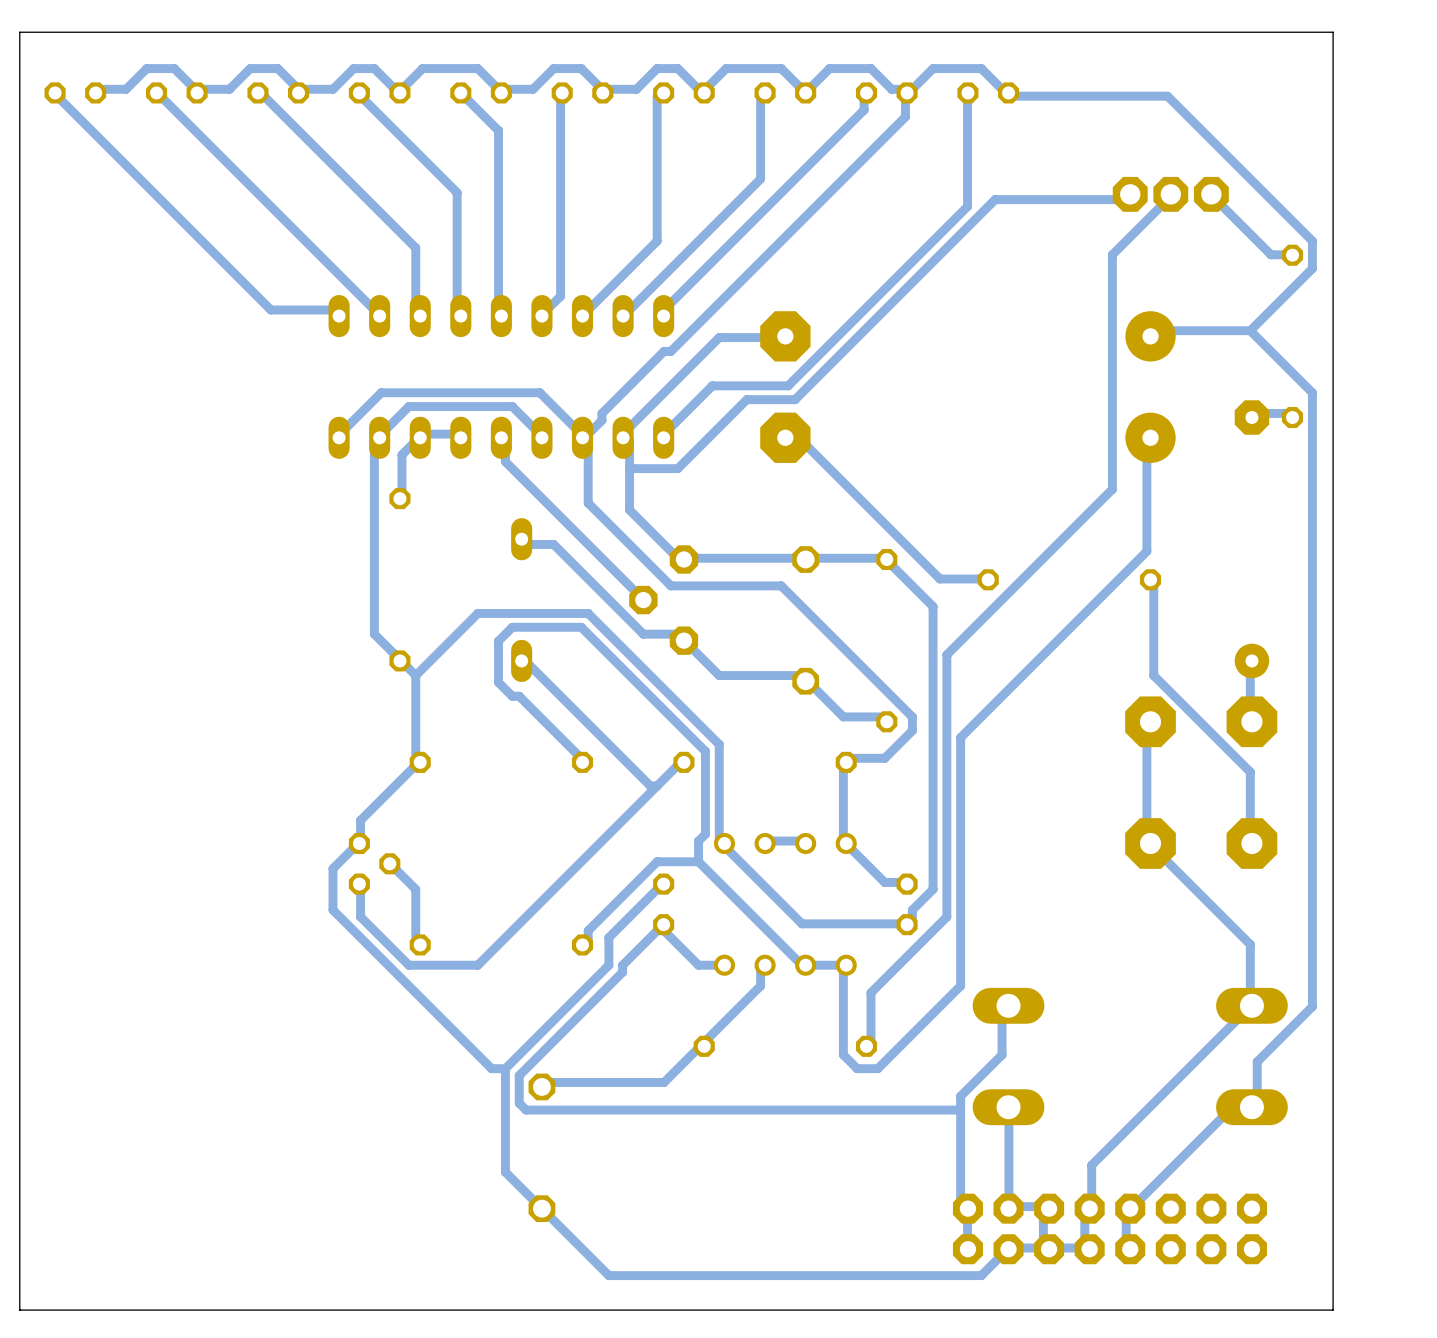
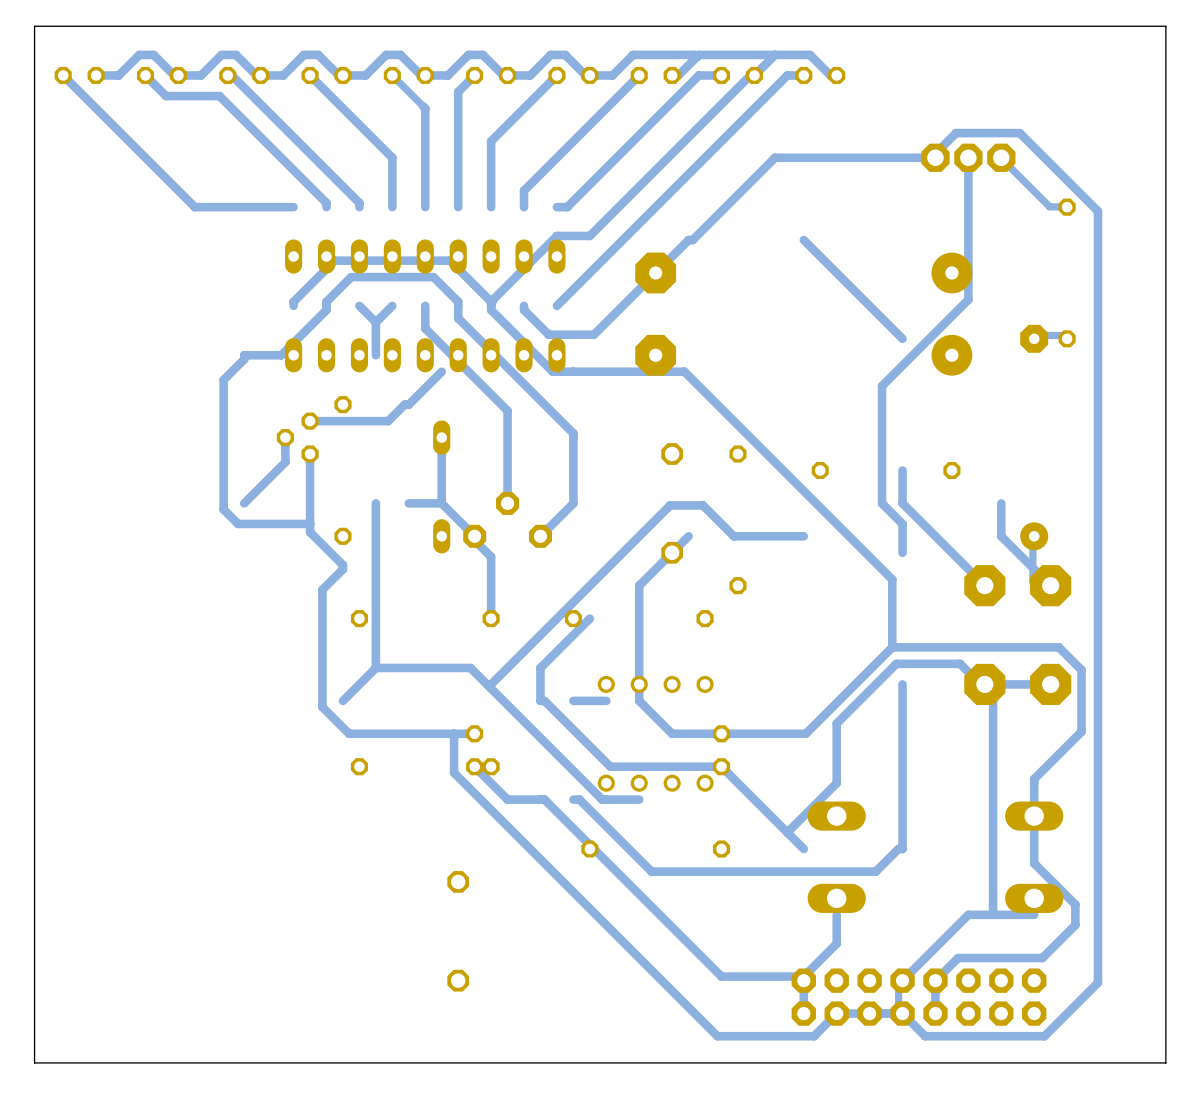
board edge: (1333, 32) (1333, 1310) -> (1100, 26) (1165, 26) (1165, 1062) (1100, 1062)
bottom track: none -> (775, 54) (754, 75) (750, 75) (589, 235) (556, 235) (493, 299) (491, 305)
bottom track: (55, 92) (270, 309) (333, 309) (339, 316) -> (63, 75) (194, 207) (293, 207)
bottom track: (156, 92) (379, 316) -> (145, 75) (166, 96) (219, 96) (326, 203) (326, 207)
bottom track: (257, 92) (264, 96) (415, 247) (415, 309) (420, 316) -> (227, 75) (231, 75) (359, 203) (359, 207)
bottom track: (359, 92) (457, 192) (457, 309) (460, 316) -> (310, 75) (392, 157) (392, 207)
bottom track: (562, 92) (560, 96) (560, 296) (541, 316) -> (474, 75) (458, 91) (458, 207)
bottom track: (663, 92) (657, 96) (657, 241) (582, 316) -> (556, 75) (491, 141) (491, 207)
bottom track: (765, 92) (760, 96) (760, 178) (623, 316) -> (639, 75) (524, 190) (524, 207)
bottom track: (866, 92) (864, 96) (864, 109) (664, 309) (663, 316) -> (721, 75) (698, 75) (567, 207) (556, 207)
bottom track: (907, 92) (905, 89) (891, 89) (870, 68) (829, 68) (805, 92) (781, 68) (726, 68) (705, 89) (704, 92) (677, 68) (657, 68) (636, 89) (608, 89) (602, 92) (601, 89) (581, 68) (553, 68) (533, 89) (505, 89) (501, 92) (477, 68) (422, 68) (399, 92) (374, 68) (353, 68) (333, 89) (298, 89) (277, 68) (250, 68) (229, 89) (201, 89) (197, 92) (174, 68) (146, 68) (126, 89) (98, 89) (95, 92) -> (696, 56) (694, 54) (633, 54) (612, 75) (585, 75) (565, 54) (550, 54) (530, 75) (503, 75) (482, 54) (468, 54) (447, 75) (421, 75) (400, 54) (386, 54) (365, 75) (338, 75) (318, 54) (303, 54) (283, 75) (256, 75) (236, 54) (221, 54) (201, 75) (174, 75) (153, 54) (139, 54) (118, 75) (96, 75)
bottom track: (907, 92) (933, 68) (981, 68) (1002, 89) (1008, 92) (1008, 96) (1167, 96) (1312, 241) (1312, 268) (1250, 330) -> none
bottom track: (907, 92) (905, 116) (670, 351) (664, 351) (601, 413) (601, 420) (582, 437) -> none
bottom track: (967, 92) (967, 206) (788, 385) (712, 385) (664, 434) (663, 437) -> (803, 75) (787, 75) (556, 305)
bottom track: none -> (836, 75) (830, 75) (809, 54) (698, 54) (678, 75) (672, 75)
bottom track: (498, 130) (498, 309) (501, 316) -> (422, 106) (425, 108) (425, 207)
bottom track: (1130, 194) (1126, 199) (995, 199) (795, 399) (746, 399) (677, 468) (629, 468) -> none
bottom track: (1170, 194) (1112, 254) (1112, 489) (946, 654) (946, 916) (870, 992) (870, 1041) (866, 1046) -> (968, 157) (968, 299) (881, 386) (881, 503) (902, 523) (902, 552)
bottom track: none -> (803, 240) (902, 338)
bottom track: (1250, 330) (1312, 392) (1312, 1006) (1257, 1061) (1257, 1103) (1250, 1110) (1229, 1110) (1126, 1213) (1126, 1248) (1130, 1249) -> (892, 647) (1058, 647) (1081, 670) (1081, 731) (1034, 779) (1034, 863) (1075, 904) (1075, 925) (1042, 958) (958, 958) (935, 980) (935, 1013)
bottom track: (1250, 330) (1153, 330) (1150, 336) -> none
bottom track: (785, 336) (719, 337) (622, 434) (623, 437) (629, 441) (629, 510) (677, 558) (683, 559) (884, 558) (933, 606) (933, 889) (912, 910) (912, 923) (802, 923) (726, 847) (724, 843) (719, 841) (719, 744) (588, 613) (477, 613) (415, 675) -> none
bottom track: none -> (293, 305) (293, 301) (334, 260) (449, 260) (491, 301) (491, 310) (552, 371) (684, 371) (892, 579) (892, 647)
bottom track: none -> (359, 305) (375, 322)
bottom track: none -> (392, 305) (375, 322)
bottom track: none -> (425, 305) (425, 328) (507, 410) (507, 503)
bottom track: none -> (524, 305) (524, 310) (548, 334) (593, 334) (688, 240) (692, 240) (775, 157) (935, 157) (935, 153) (956, 133) (1019, 133) (1097, 211) (1097, 982) (1044, 1036) (925, 1036) (902, 1013) (836, 1013) (814, 1036) (717, 1036) (454, 772) (454, 733)
bottom track: none -> (375, 322) (375, 355)
bottom track: (460, 437) (457, 434) (422, 434) (401, 454) (401, 496) (399, 498) -> none
bottom track: (501, 437) (505, 441) (505, 461) (643, 600) -> none
bottom track: (541, 437) (512, 406) (408, 406) (374, 441) (374, 634) (415, 675) -> none
bottom track: (582, 437) (581, 434) (539, 392) (381, 392) (339, 434) (339, 437) -> none
bottom track: (582, 437) (588, 441) (588, 503) (670, 585) (781, 585) (912, 716) (912, 730) (884, 758) (850, 758) (843, 765) (843, 841) (884, 882) (905, 882) (907, 884) -> none
bottom track: (785, 437) (788, 441) (802, 441) (939, 578) (988, 579) -> none
bottom track: (1150, 437) (1146, 441) (1146, 551) (960, 737) (960, 985) (877, 1068) (857, 1068) (843, 1054) (843, 965) -> none
bottom track: none -> (441, 371) (408, 404) (404, 404) (388, 421) (310, 421)
bottom track: none -> (285, 437) (285, 462) (244, 503)
bottom track: (521, 539) (526, 544) (553, 544) (643, 634) (677, 634) (719, 675) (802, 675) (843, 716) (884, 716) (886, 721) -> (441, 437) (441, 503)
bottom track: none -> (310, 454) (310, 532) (342, 565) (342, 569) (322, 589) (322, 707) (349, 733) (474, 733)
bottom track: none -> (902, 470) (902, 503) (984, 585)
bottom track: (1150, 579) (1153, 585) (1153, 675) (1250, 772) (1250, 841) (1251, 843) -> none
part rotation: 0° (663, 600) -> 90° clockwise (507, 519)
part position: (663, 600) -> (507, 519)
bottom track: none -> (375, 503) (375, 667)
bottom track: none -> (441, 503) (408, 503)
bottom track: none -> (1001, 503) (1001, 536) (1050, 585)
bottom track: none -> (310, 523) (238, 523) (223, 509) (223, 379) (244, 359) (244, 355) (281, 355) (326, 310) (326, 301) (351, 277) (433, 277) (458, 301) (458, 318) (573, 433) (573, 503) (540, 536)
bottom track: (521, 660) (526, 661) (650, 785) (657, 785) -> none
bottom track: none -> (688, 536) (639, 585) (639, 700) (672, 733) (805, 733) (892, 647)
bottom track: none -> (803, 536) (733, 536) (703, 505) (670, 505) (489, 686)
bottom track: (415, 675) (415, 758) (420, 762) (360, 820) (359, 843) (333, 868) (333, 910) (491, 1068) (505, 1068) -> none
bottom track: (1150, 721) (1146, 723) (1146, 841) (1250, 944) (1251, 1005) (1091, 1165) (1091, 1206) -> (1034, 914) (968, 914) (904, 979)
part: (1150, 721) -> none
part: none -> (984, 585)
part position: (1251, 721) -> (1050, 585)
bottom track: (582, 762) (581, 758) (519, 696) (512, 696) (498, 682) (498, 641) (512, 627) (581, 627) (705, 751) (705, 834) (698, 841) (698, 861) -> (491, 618) (491, 556) (474, 540) (474, 536) (441, 503)
bottom track: (683, 762) (677, 765) (477, 965) (408, 965) (360, 916) (359, 884) -> none
bottom track: none -> (589, 618) (540, 667) (540, 700) (544, 700) (610, 766) (721, 766) (803, 849)
bottom track: none -> (375, 667) (342, 700)
bottom track: none -> (375, 667) (470, 667) (602, 799) (639, 799)
bottom track: (805, 843) (802, 841) (767, 841) (765, 843) -> none
bottom track: none -> (902, 684) (902, 849) (898, 849) (875, 871) (651, 871) (579, 799) (573, 799)
part: (1150, 843) -> none
bottom track: none -> (984, 684) (993, 688) (993, 914)
part: none -> (984, 684)
part position: (1251, 843) -> (1050, 684)
bottom track: none -> (1050, 684) (980, 684) (960, 663) (896, 663) (836, 723) (836, 783) (787, 832)
bottom track: (698, 861) (657, 861) (588, 930) (588, 944) (582, 944) -> none
bottom track: (698, 861) (802, 965) (846, 965) -> none
part rotation: 0° (374, 863) -> 180° (297, 437)
part position: (374, 863) -> (297, 437)
bottom track: (389, 863) (415, 889) (415, 944) (420, 944) -> none
bottom track: none -> (606, 700) (573, 700)
bottom track: (663, 884) (608, 937) (608, 965) (505, 1068) -> none
part: (663, 904) -> none
part position: (907, 904) -> (721, 750)
part: none -> (474, 750)
bottom track: none -> (474, 766) (507, 799) (544, 799) (721, 976) (799, 976) (803, 980)
bottom track: (724, 965) (698, 965) (664, 930) (663, 924) (622, 965) (622, 972) (519, 1075) (519, 1103) (526, 1110) (960, 1110) -> none
bottom track: (765, 965) (760, 965) (760, 985) (705, 1041) (704, 1046) (698, 1047) (664, 1082) (546, 1082) (541, 1086) -> none
bottom track: (1008, 1005) (1002, 1006) (1002, 1054) (960, 1096) (960, 1199) (967, 1208) (967, 1249) -> (836, 914) (836, 943) (803, 976) (803, 1013)
bottom track: (505, 1068) (505, 1172) (608, 1275) (981, 1275) (1008, 1248) (1043, 1248) (1043, 1213) (1049, 1208) (1043, 1206) (1008, 1206) (1008, 1107) -> none

